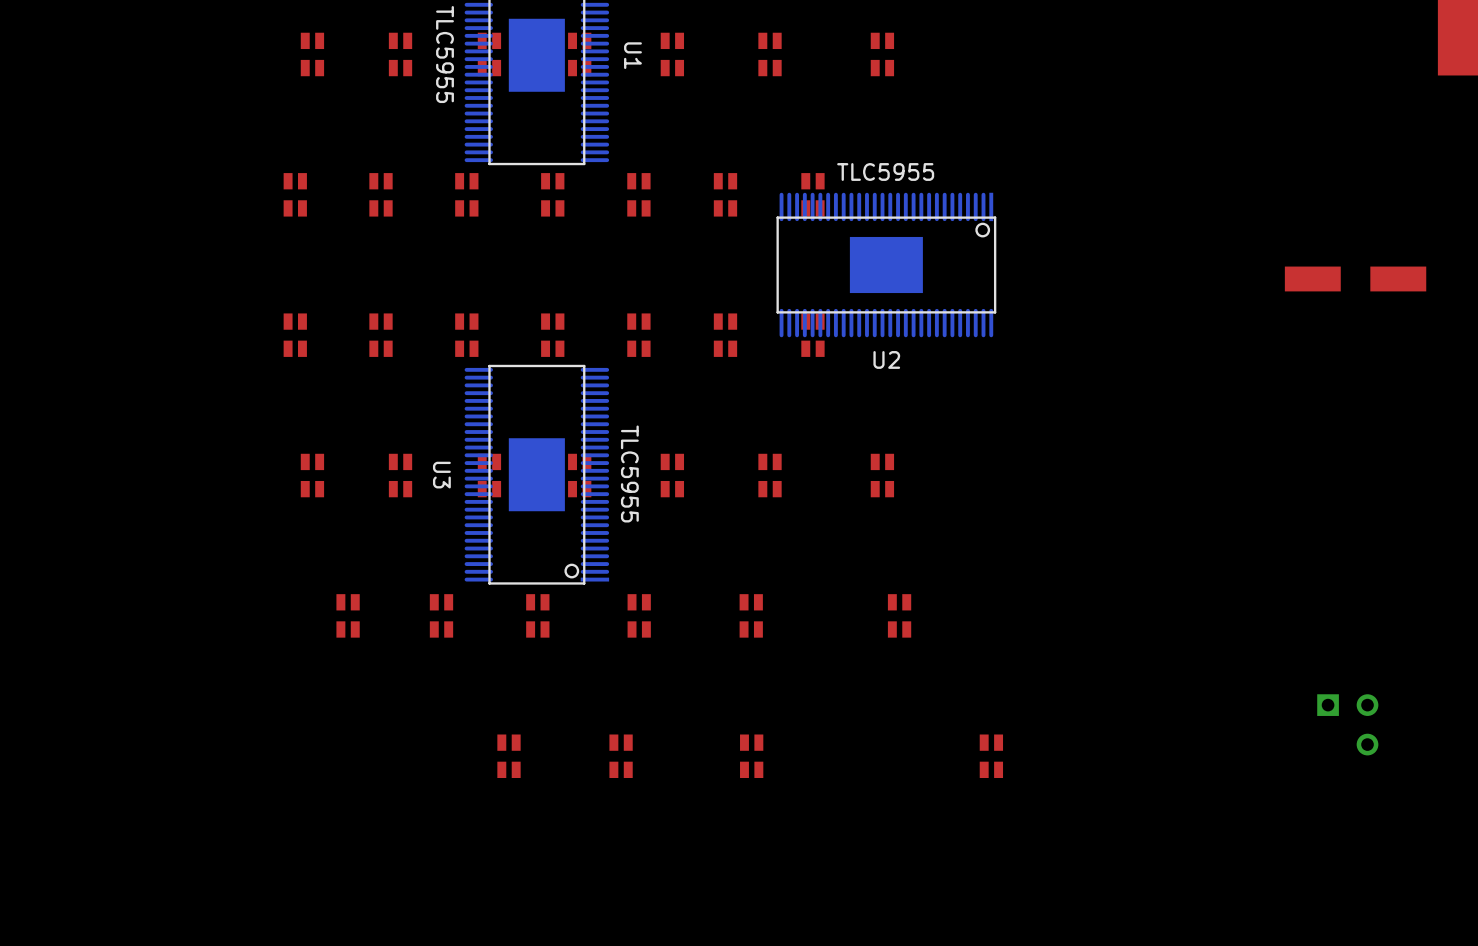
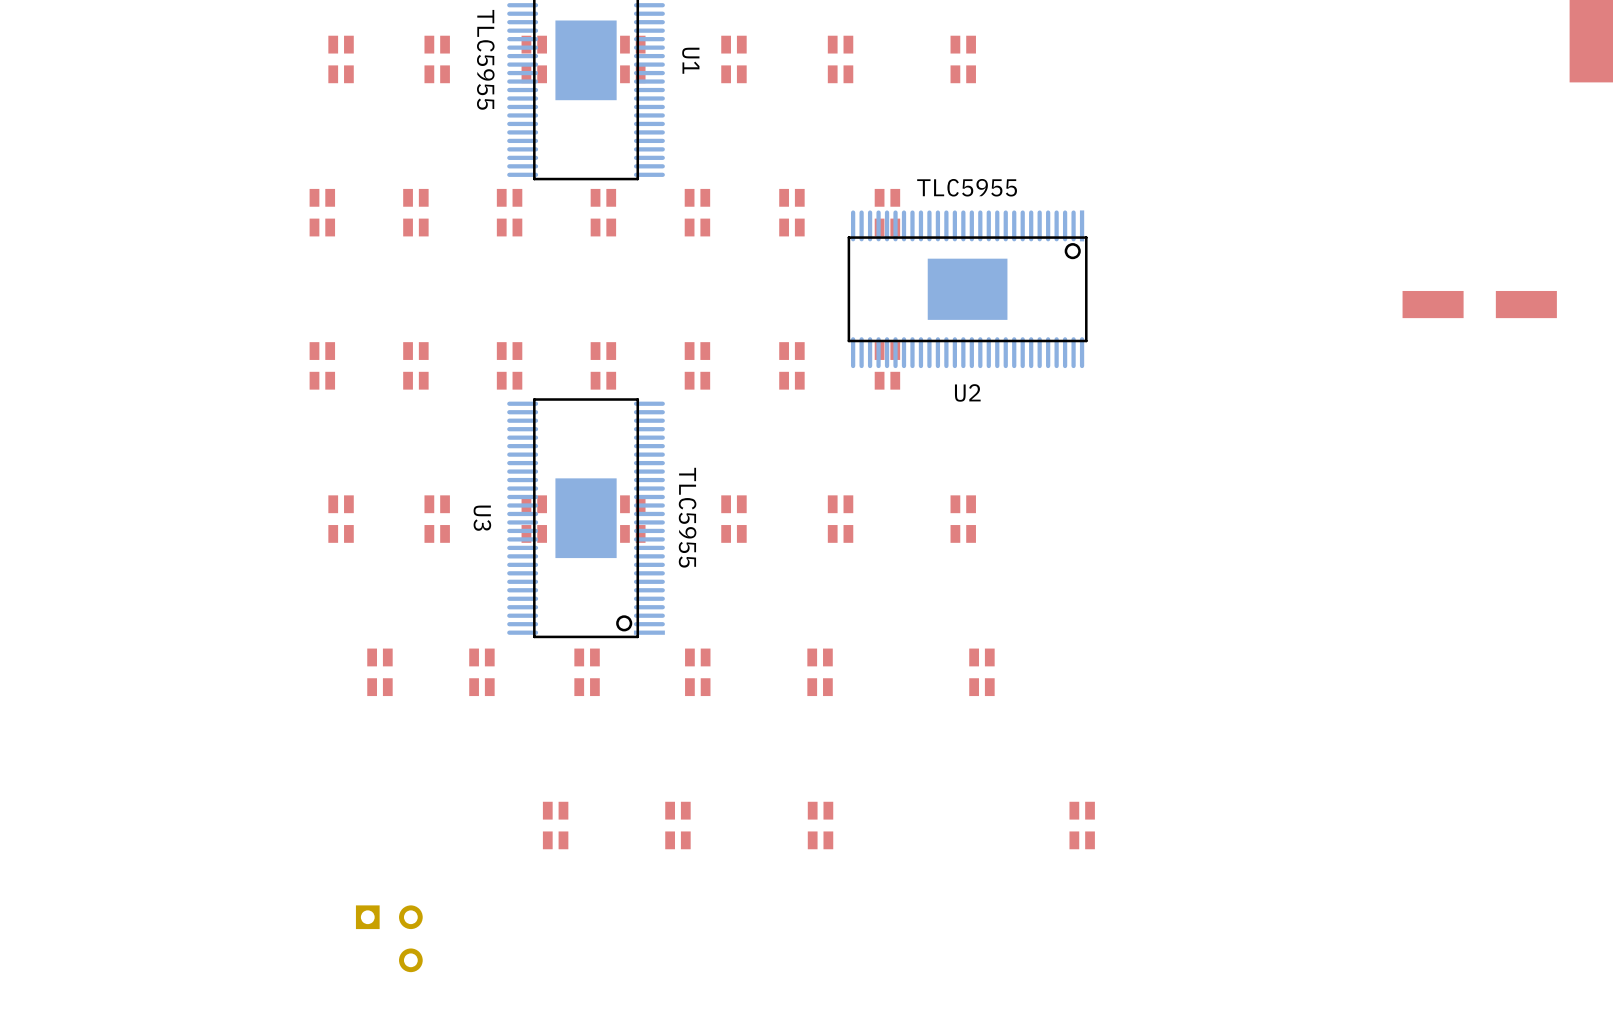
part: (1347, 724) -> none
part: none -> (389, 938)

